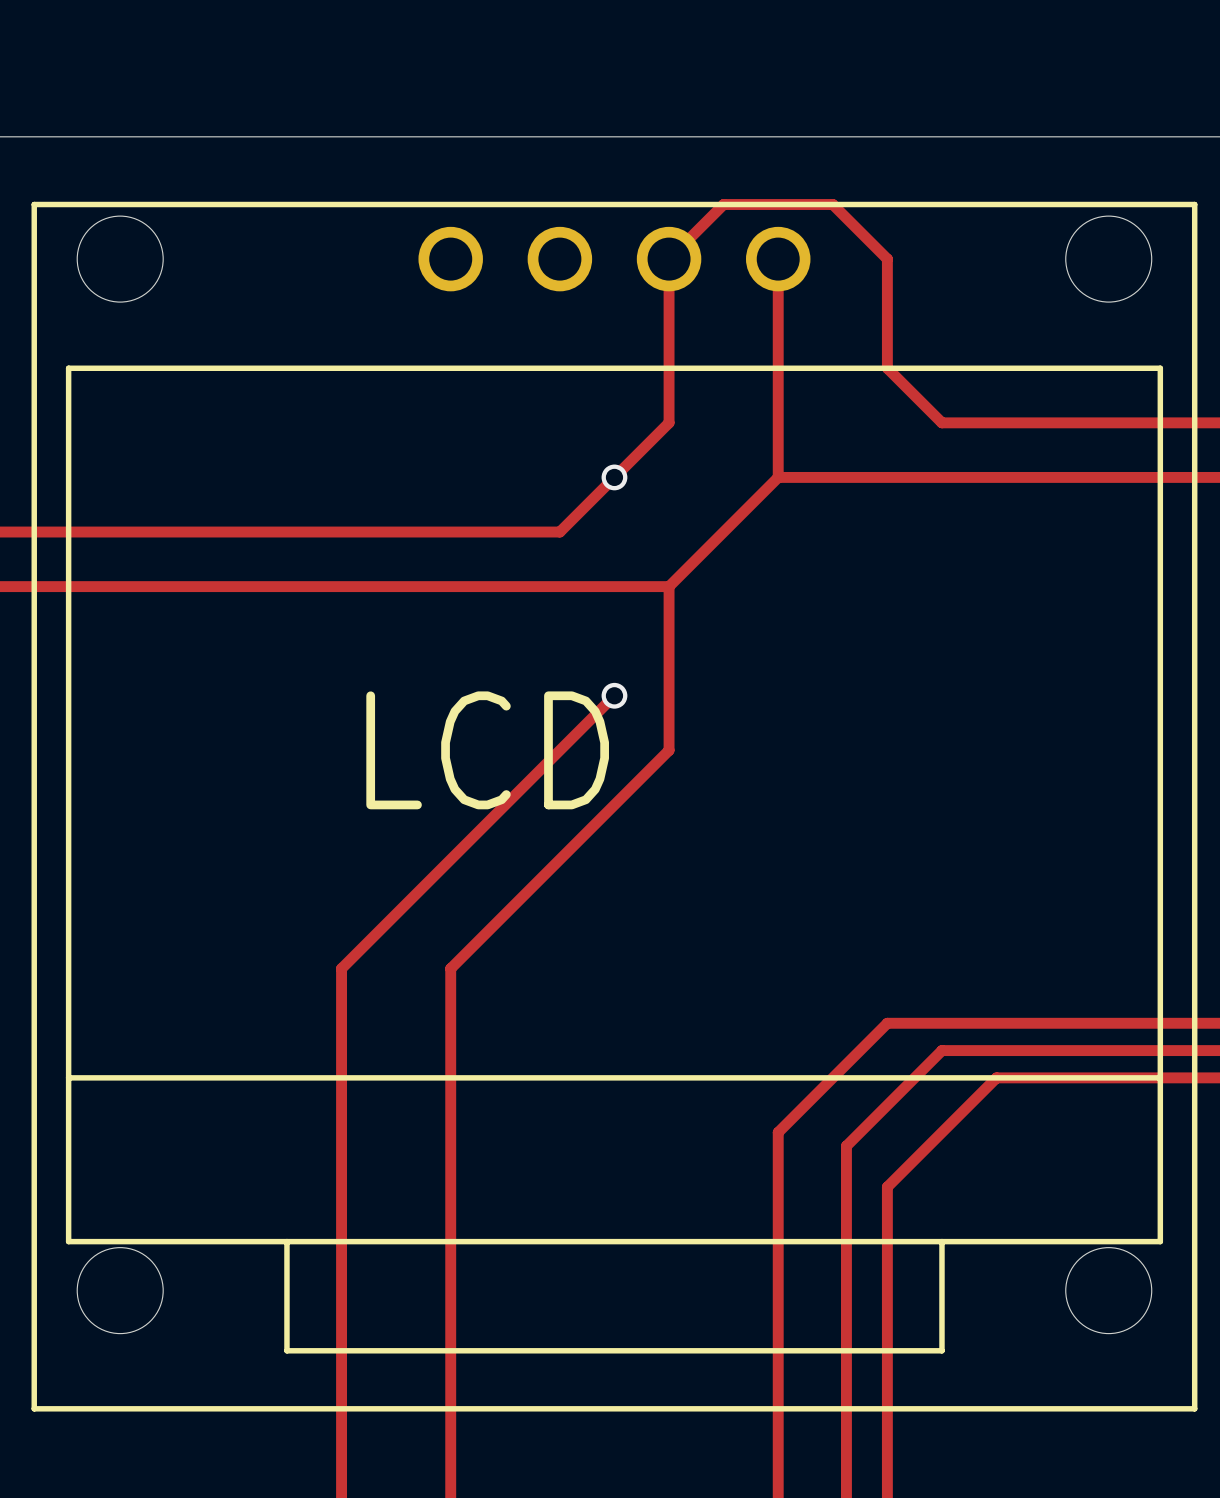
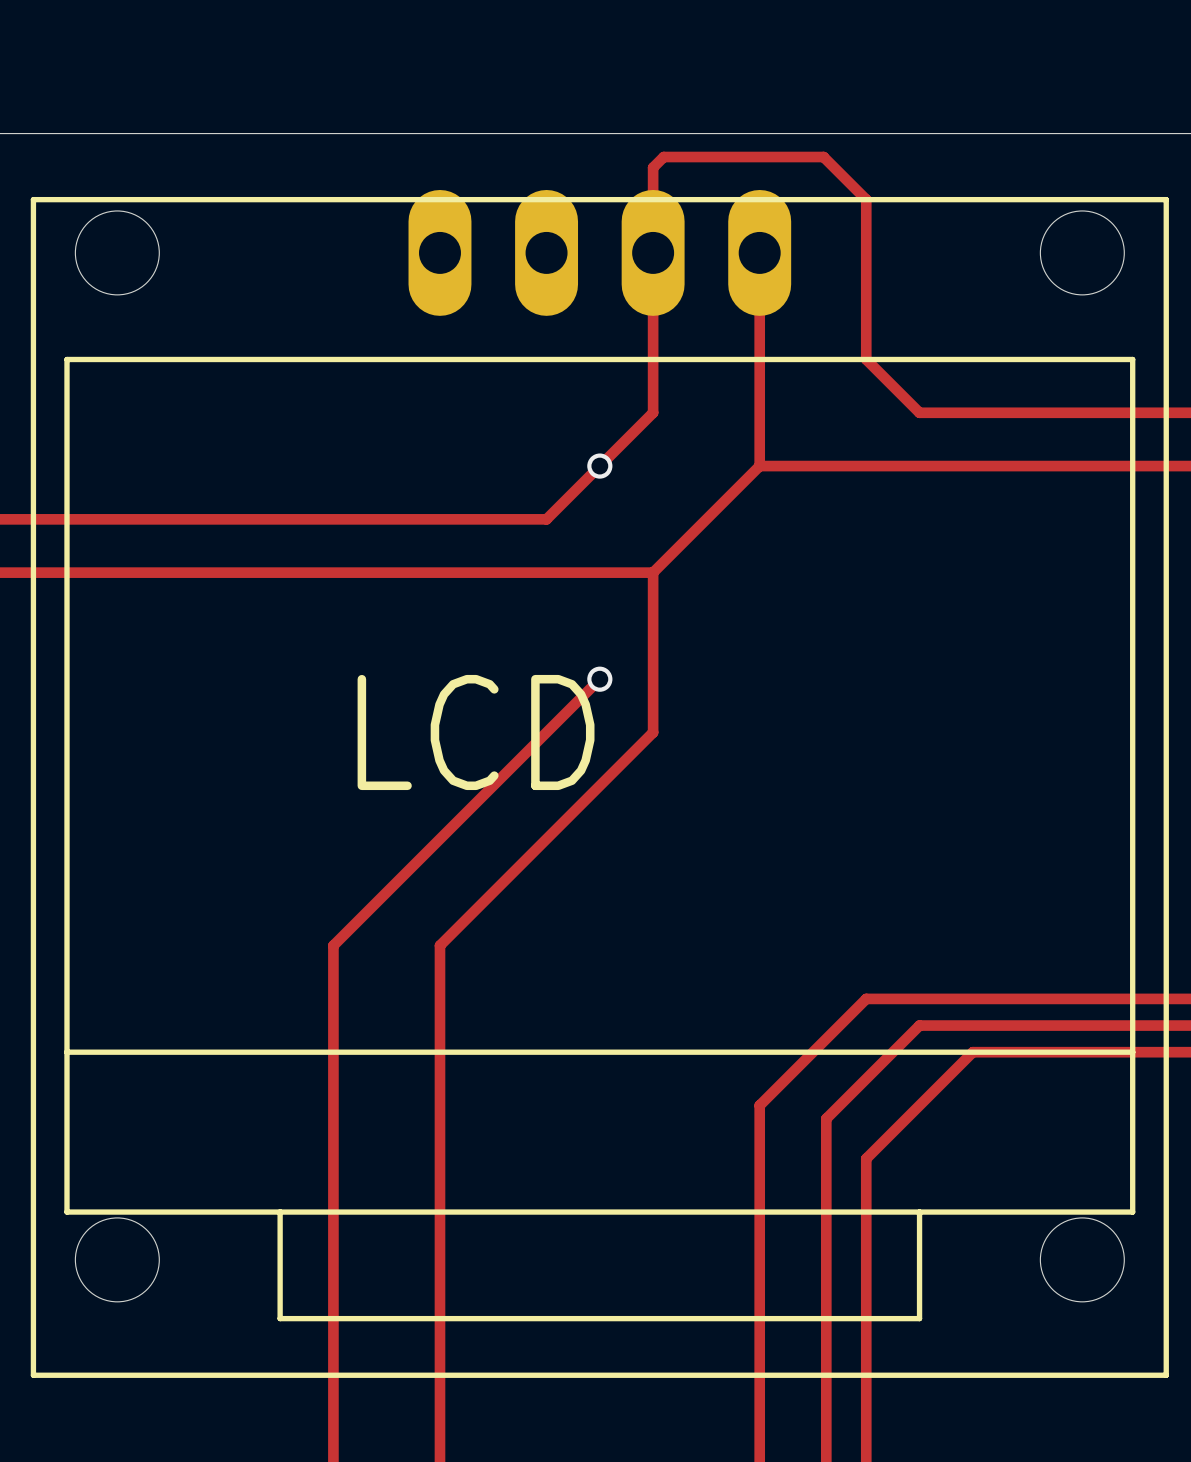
LCD footprint: [31, 201, 1198, 1412] -> [30, 189, 1169, 1378]
track: (669, 259) (723, 204) (832, 204) (887, 259) -> (653, 252) (653, 167) (663, 157) (823, 157) (866, 199) (866, 252)

